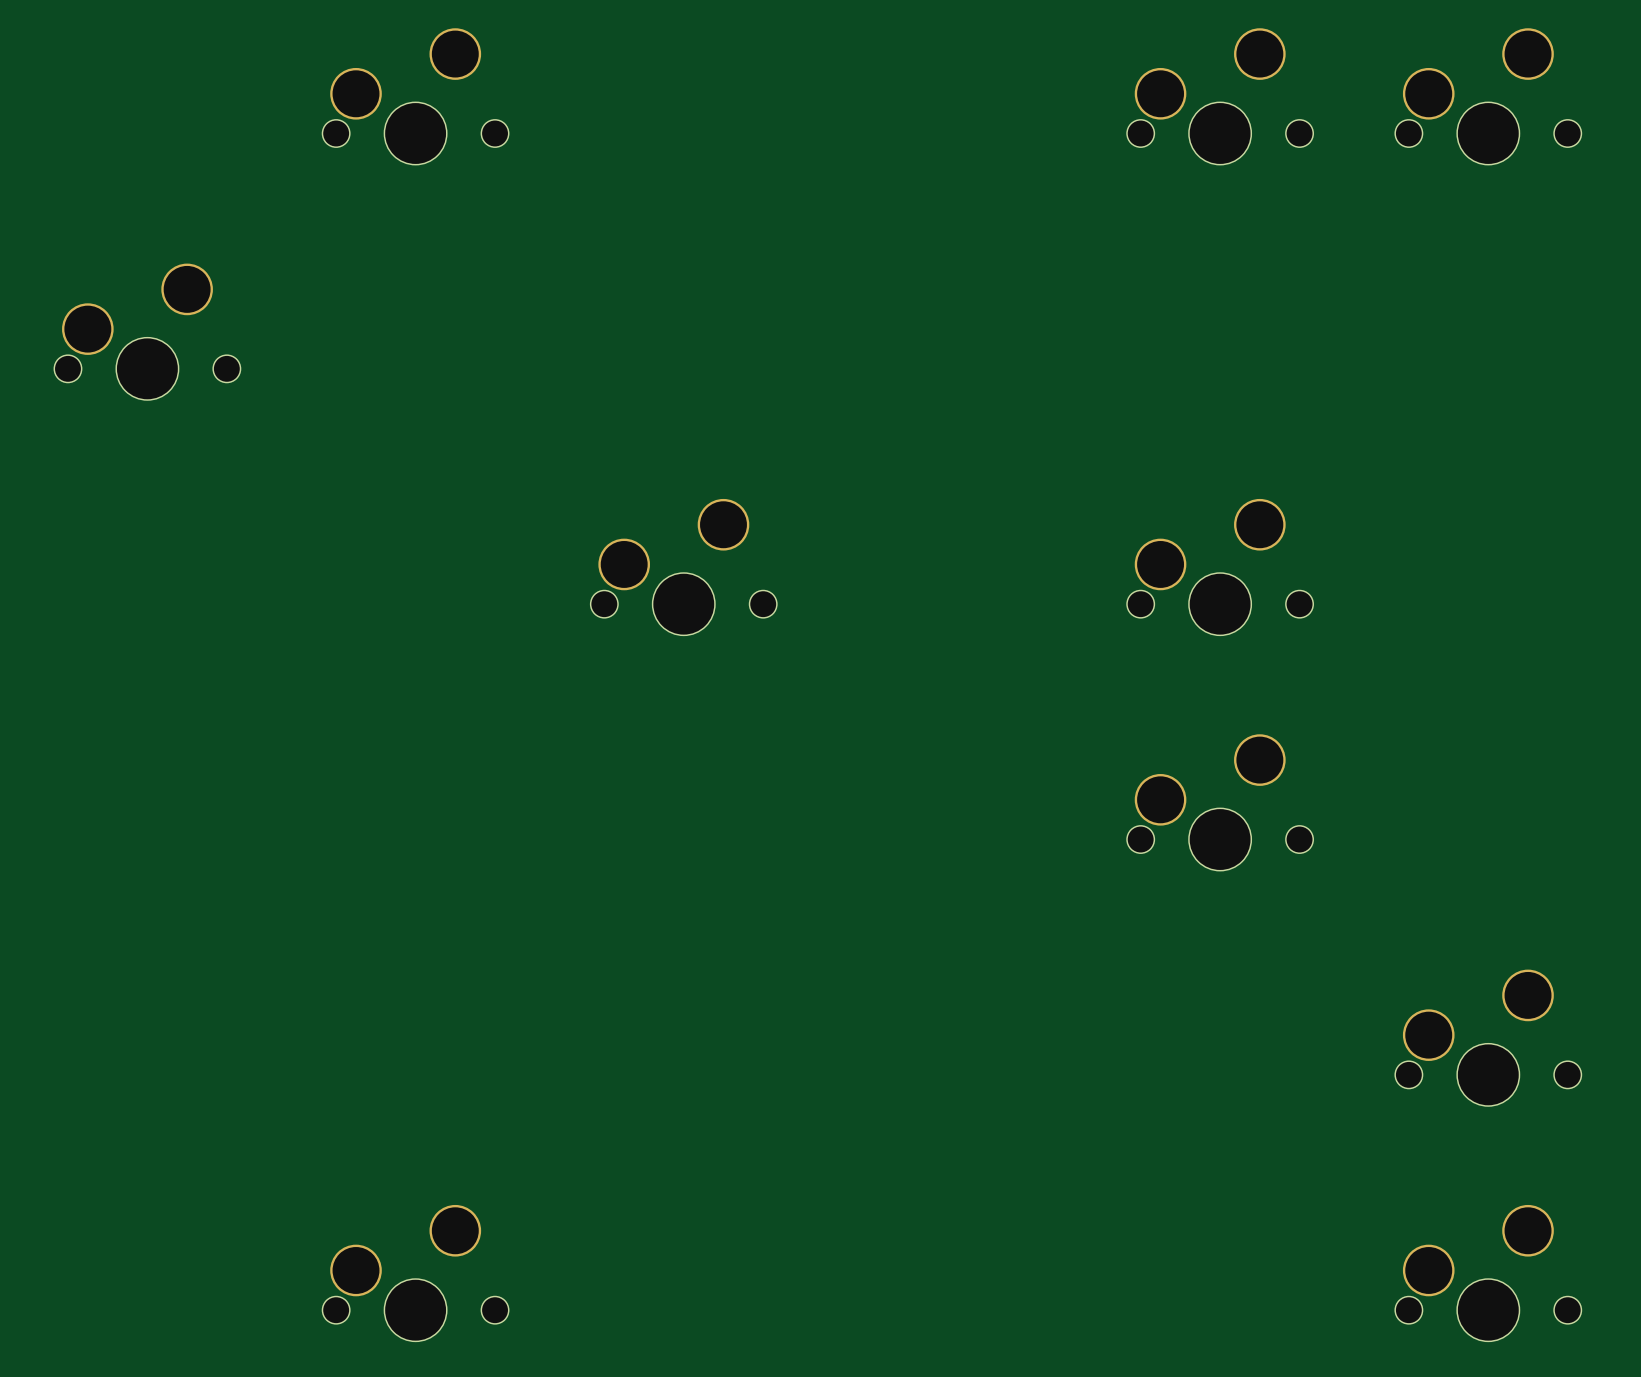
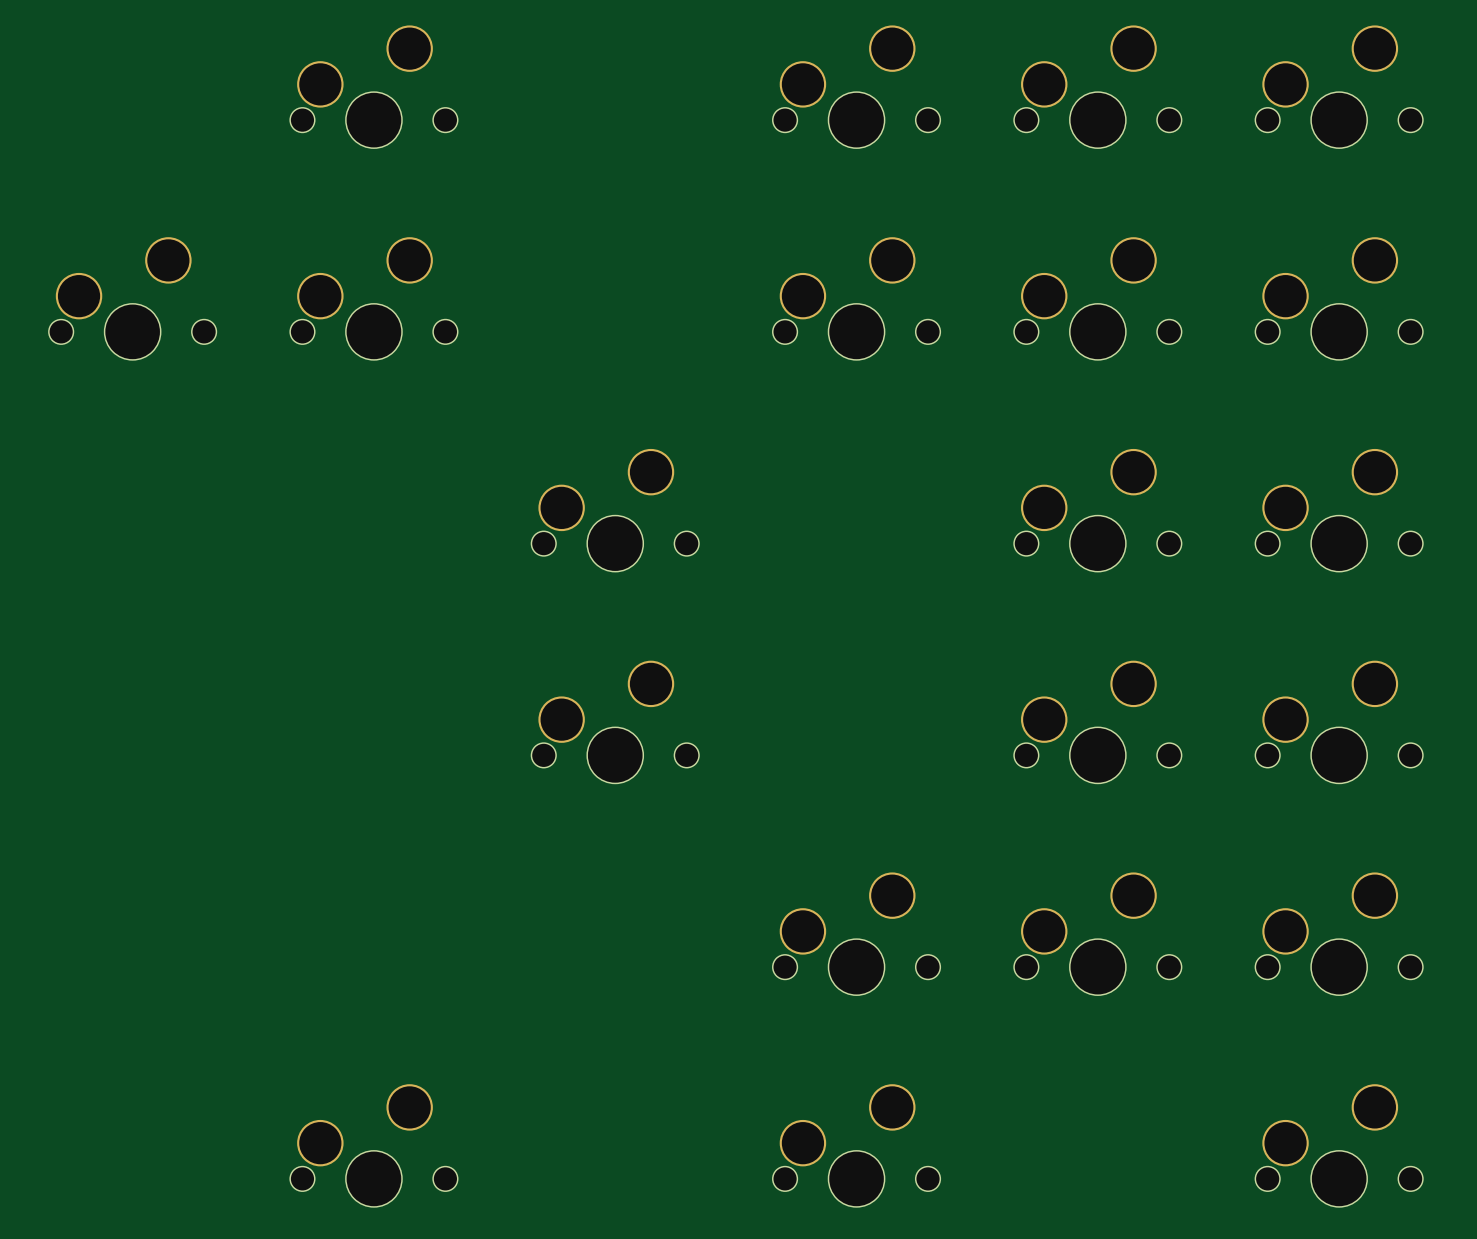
part: none -> (856, 86)
part: none -> (373, 298)
part: none -> (856, 298)
part: none -> (1097, 298)
part: none -> (1339, 298)
part: none -> (1339, 510)
part: none -> (615, 722)
part: none -> (1339, 722)
part: none -> (856, 933)
part: none -> (1097, 933)
part: none -> (856, 1145)

